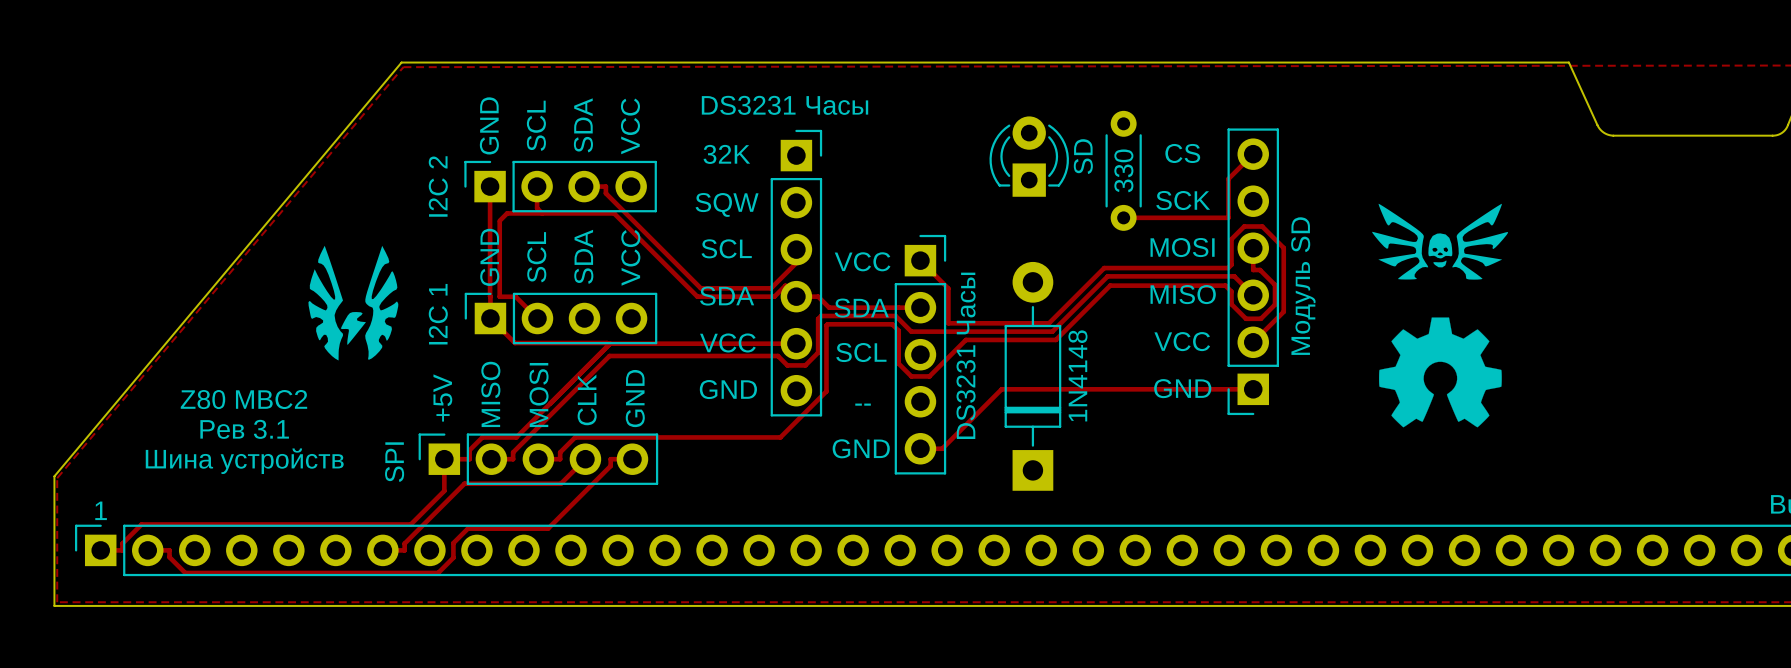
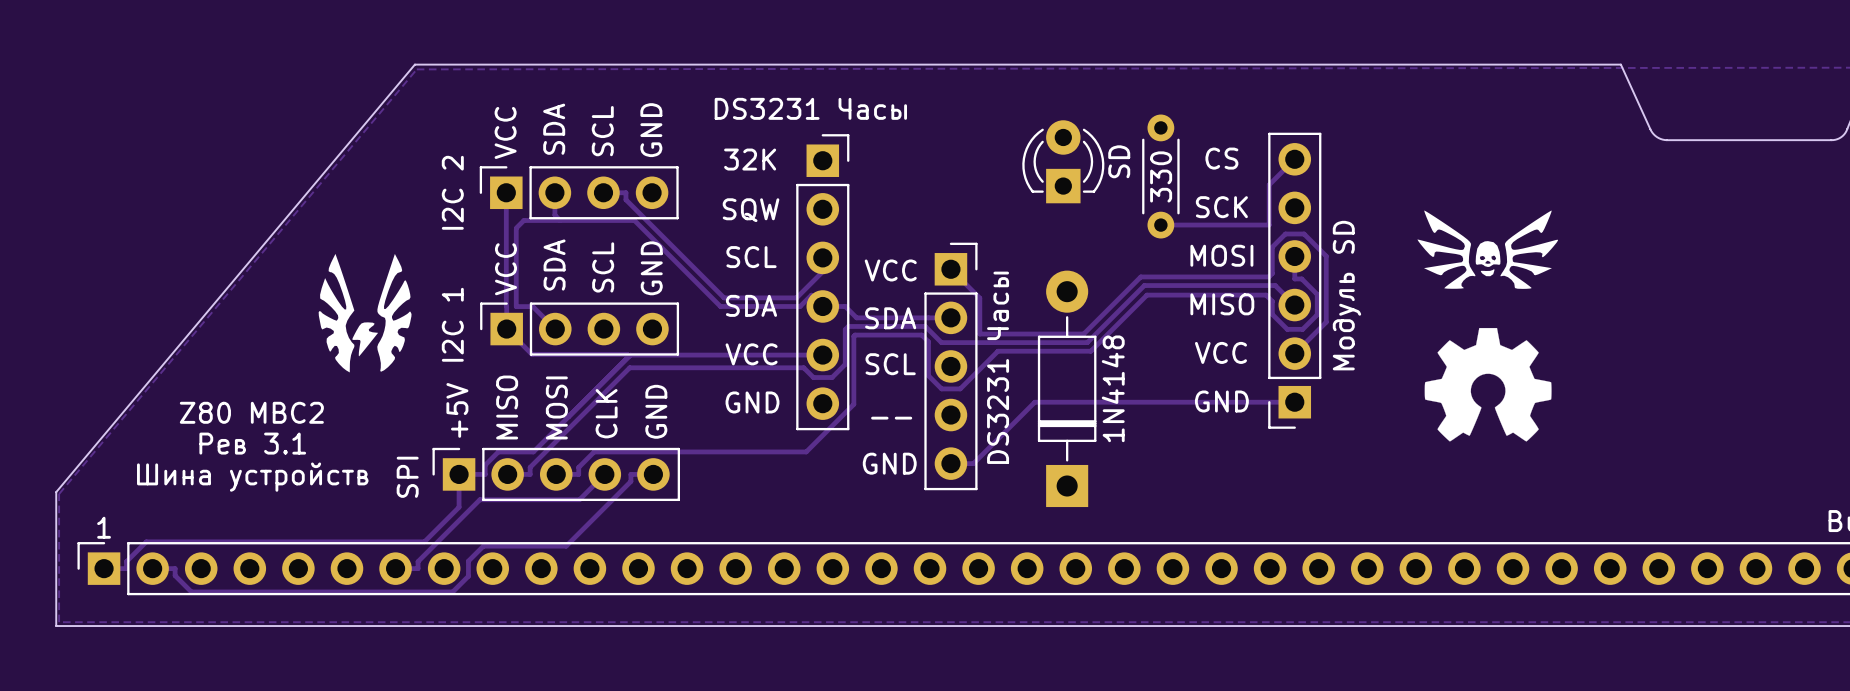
part text: GND (489, 125) -> none
part text: SCL (536, 125) -> SDA (554, 129)
part text: SDA (583, 125) -> none
part text: VCC (630, 126) -> GND (651, 130)
part text: none -> SCL (602, 131)
part text: none -> VCC (505, 132)
part text: SDA (583, 256) -> none
part text position: GND (489, 257) -> GND (651, 268)
part text: SCL (536, 257) -> SDA (554, 265)
part text position: VCC (630, 257) -> VCC (505, 269)
part text: none -> SCL (603, 267)

